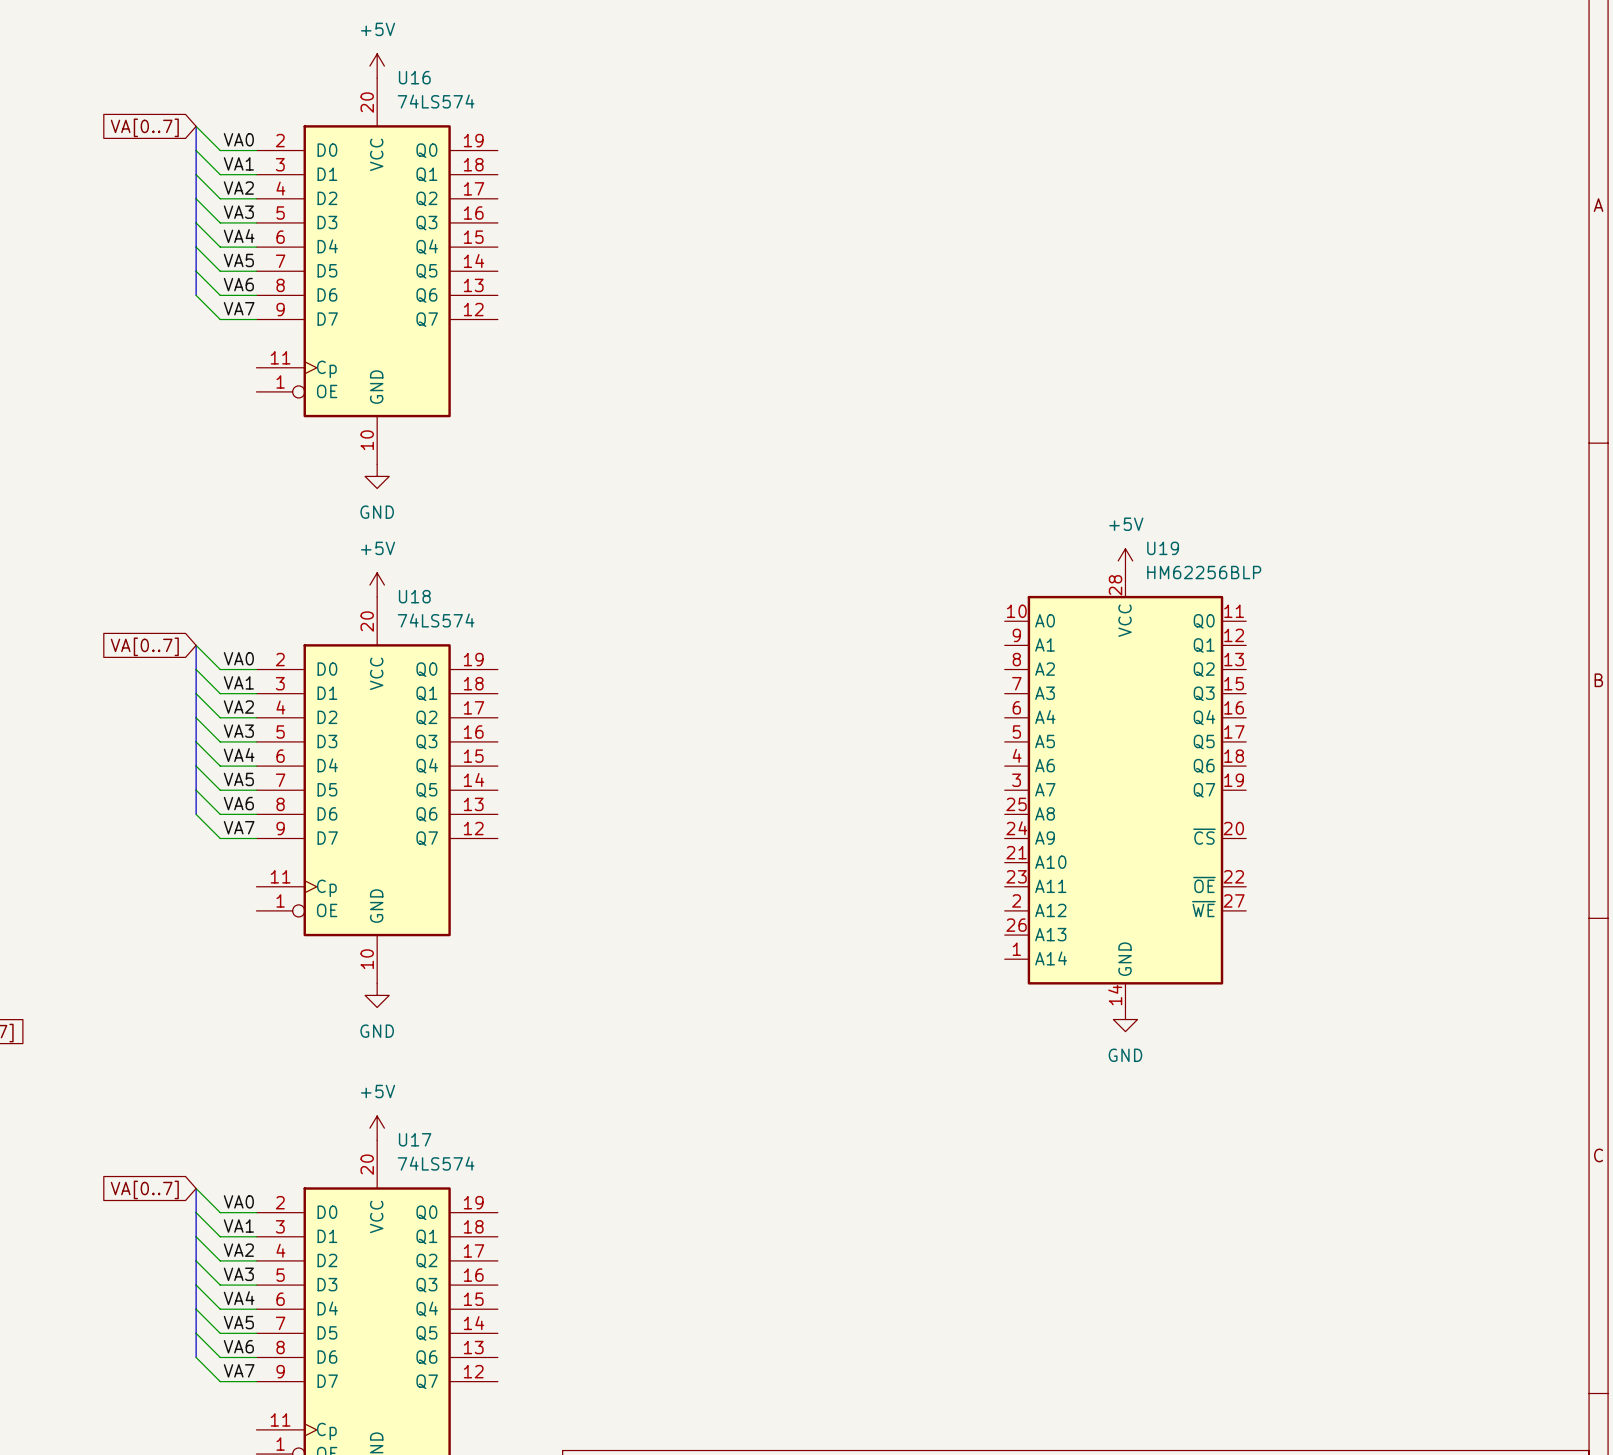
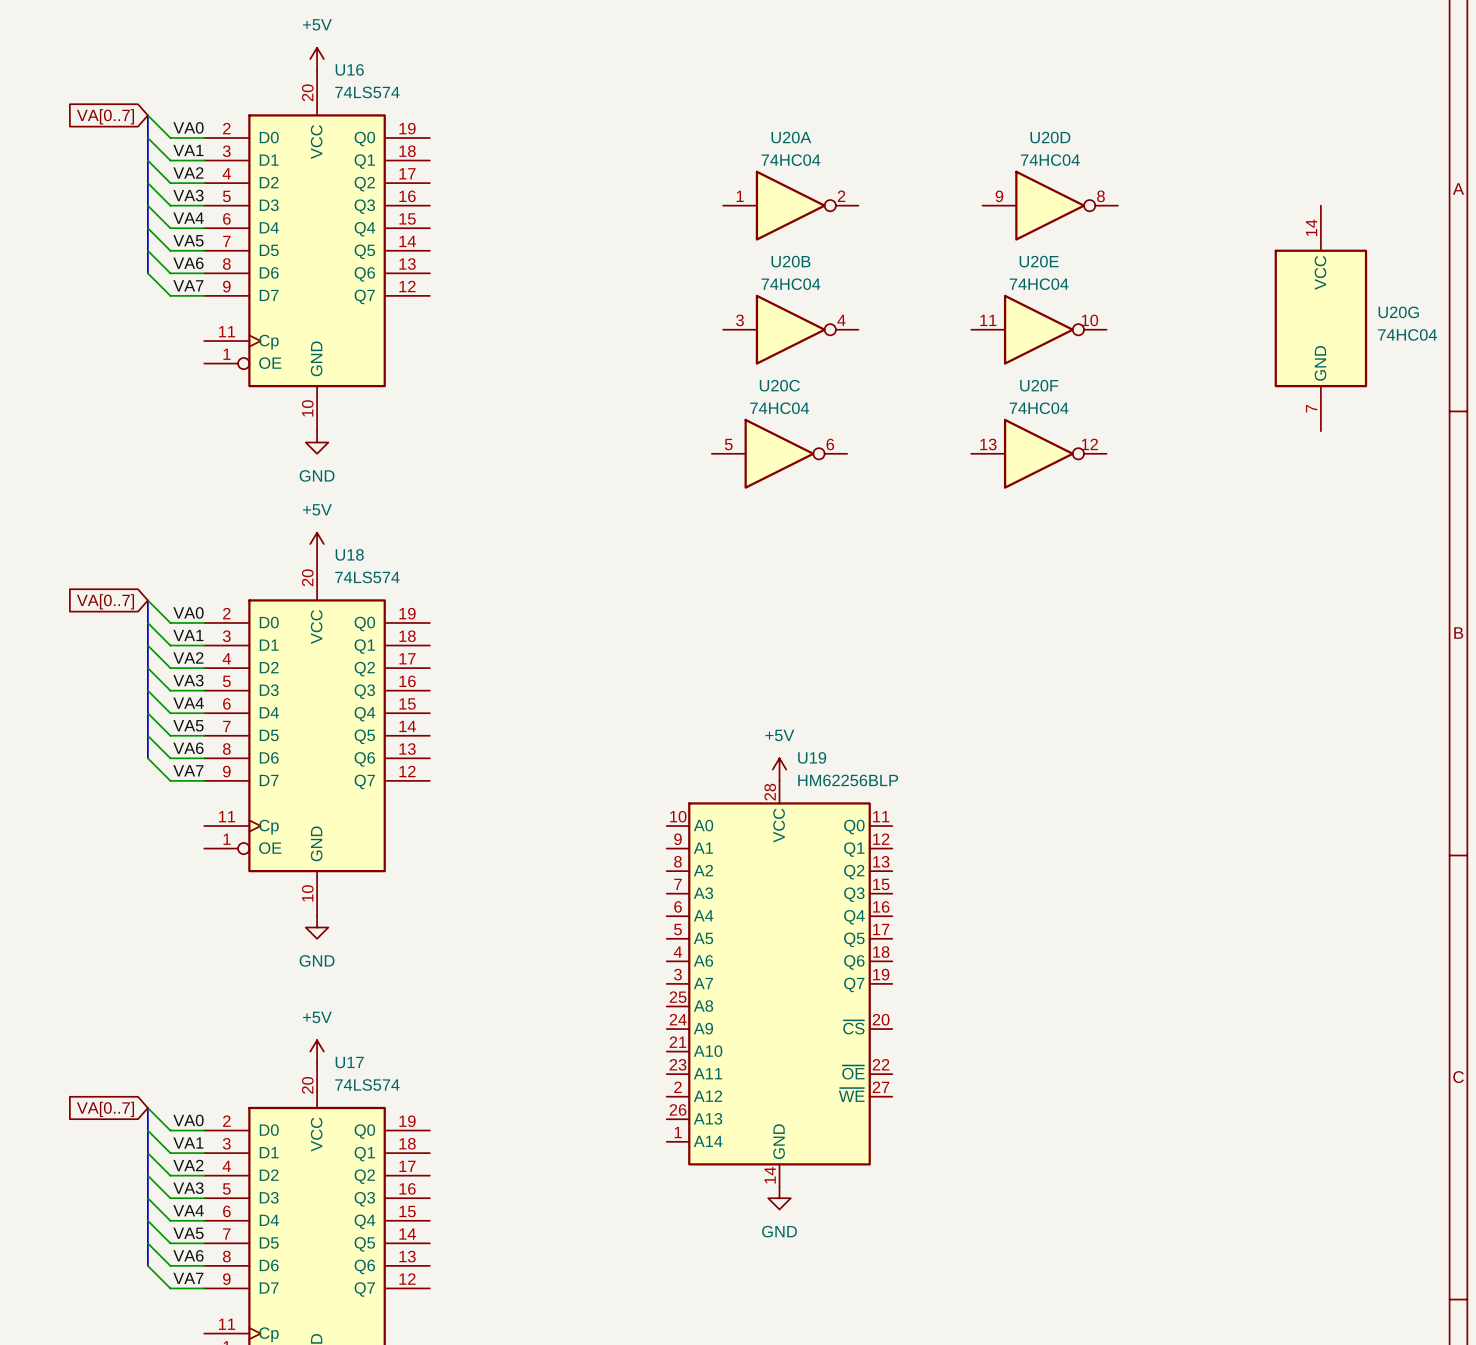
U20A: none -> 74HC04 (790, 205)
U20D: none -> 74HC04 (1050, 205)
U20G: none -> 74HC04 (1320, 318)
U20B: none -> 74HC04 (790, 329)
U20E: none -> 74HC04 (1038, 329)
U20C: none -> 74HC04 (779, 453)
U20F: none -> 74HC04 (1038, 453)
power symbol: +5V (1125, 560) -> none
U19 position: (1125, 790) -> (779, 983)
power symbol: none -> +5V (779, 769)
power symbol: GND (1125, 1019) -> none
power symbol: none -> GND (779, 1198)

